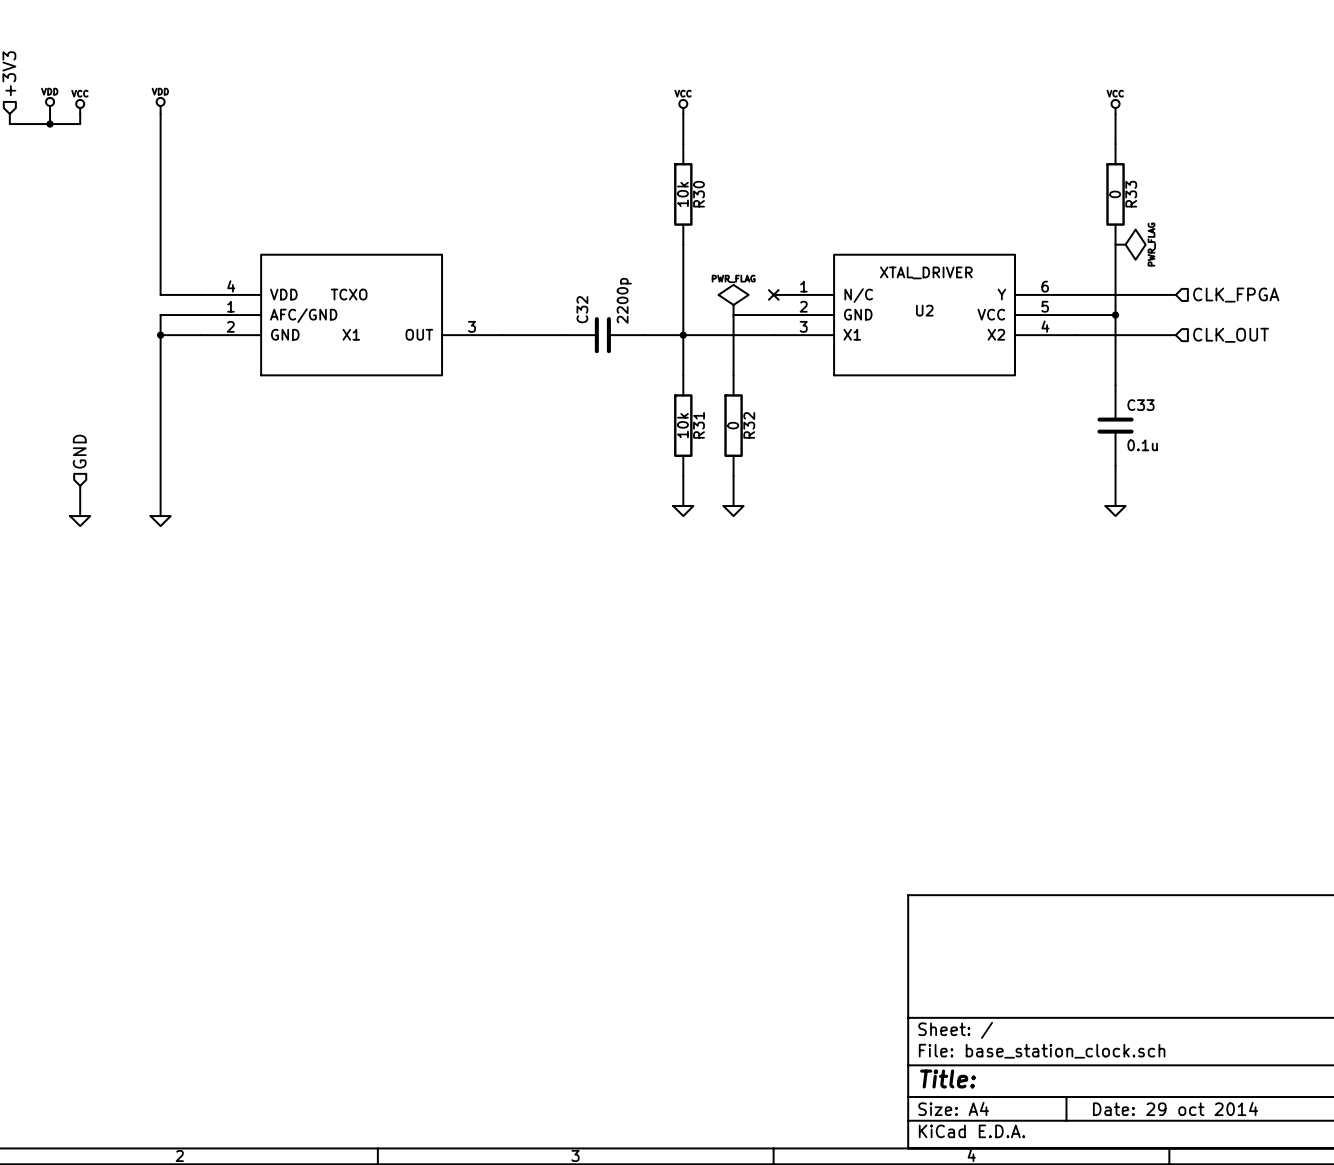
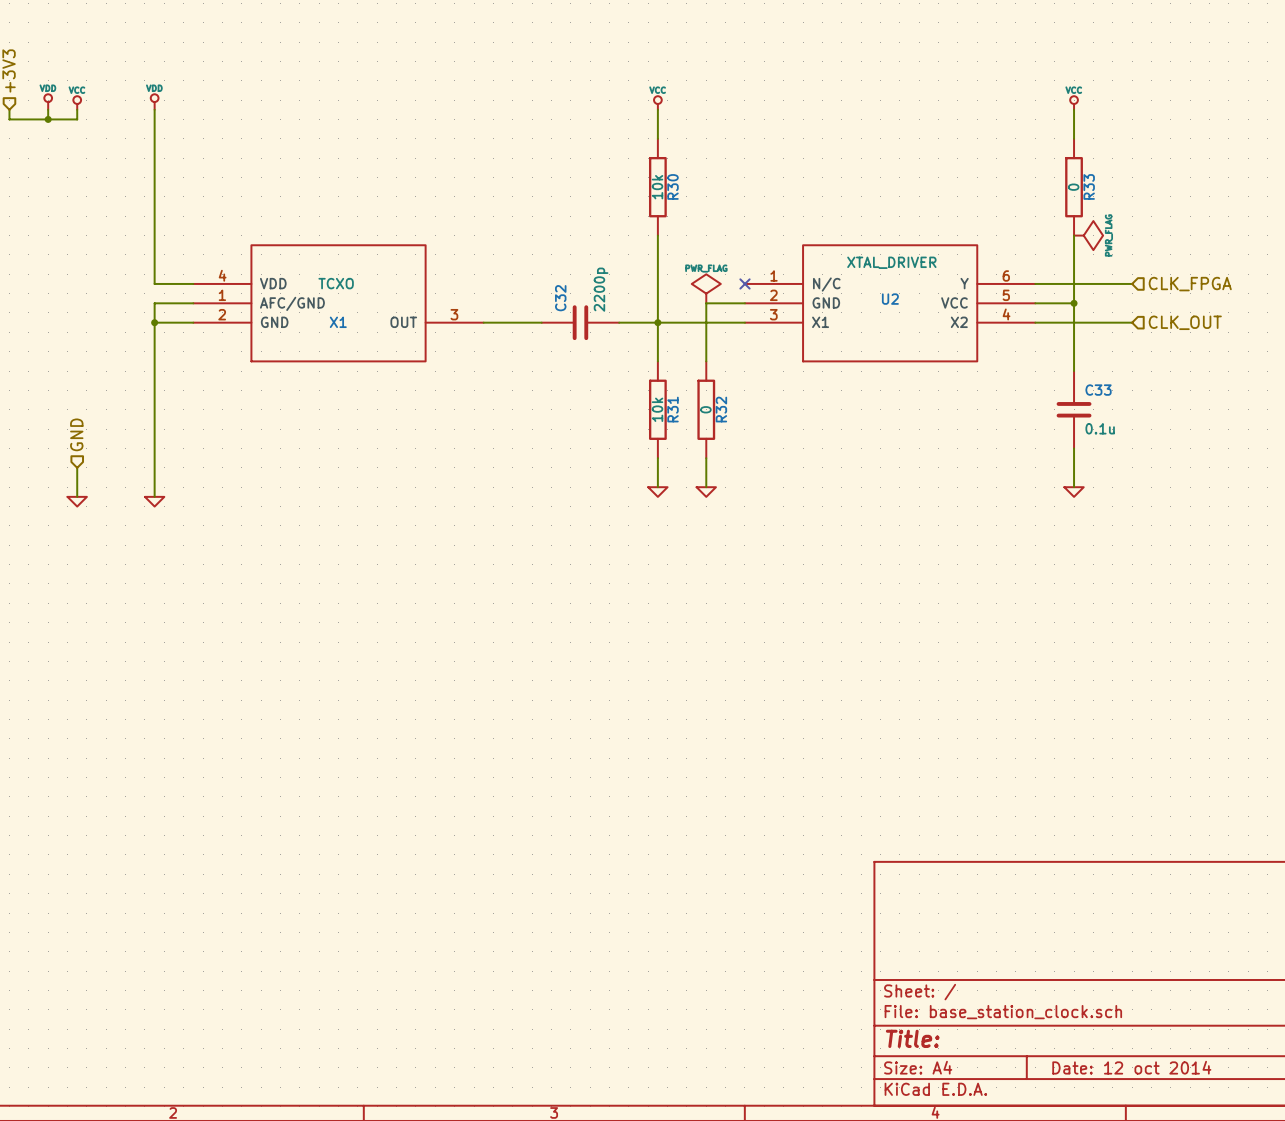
title block: Date: 29 oct 2014 (1175, 1108) -> Date: 12 oct 2014 (1131, 1067)

